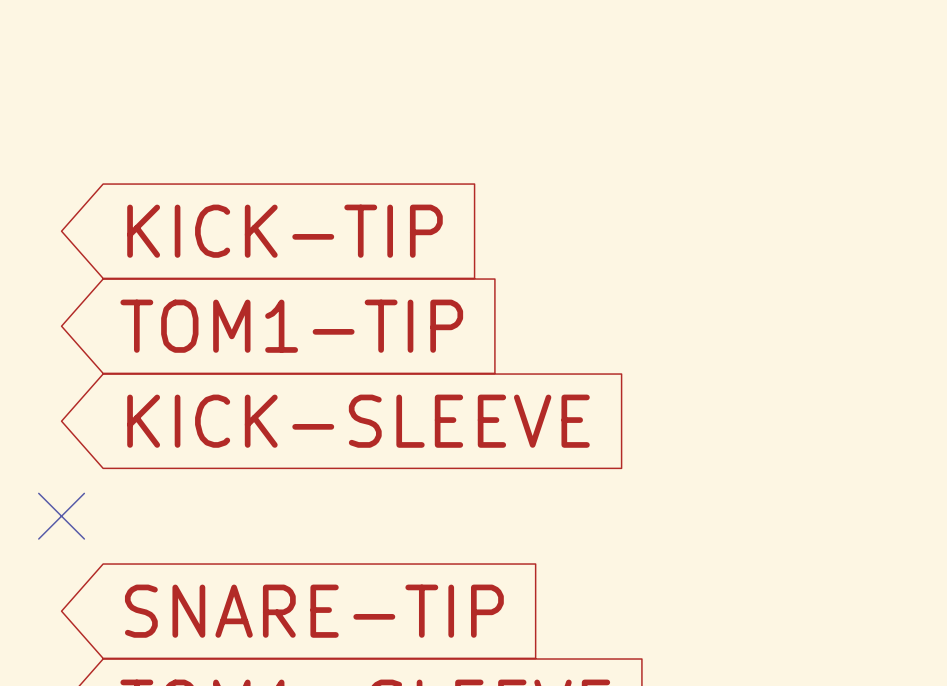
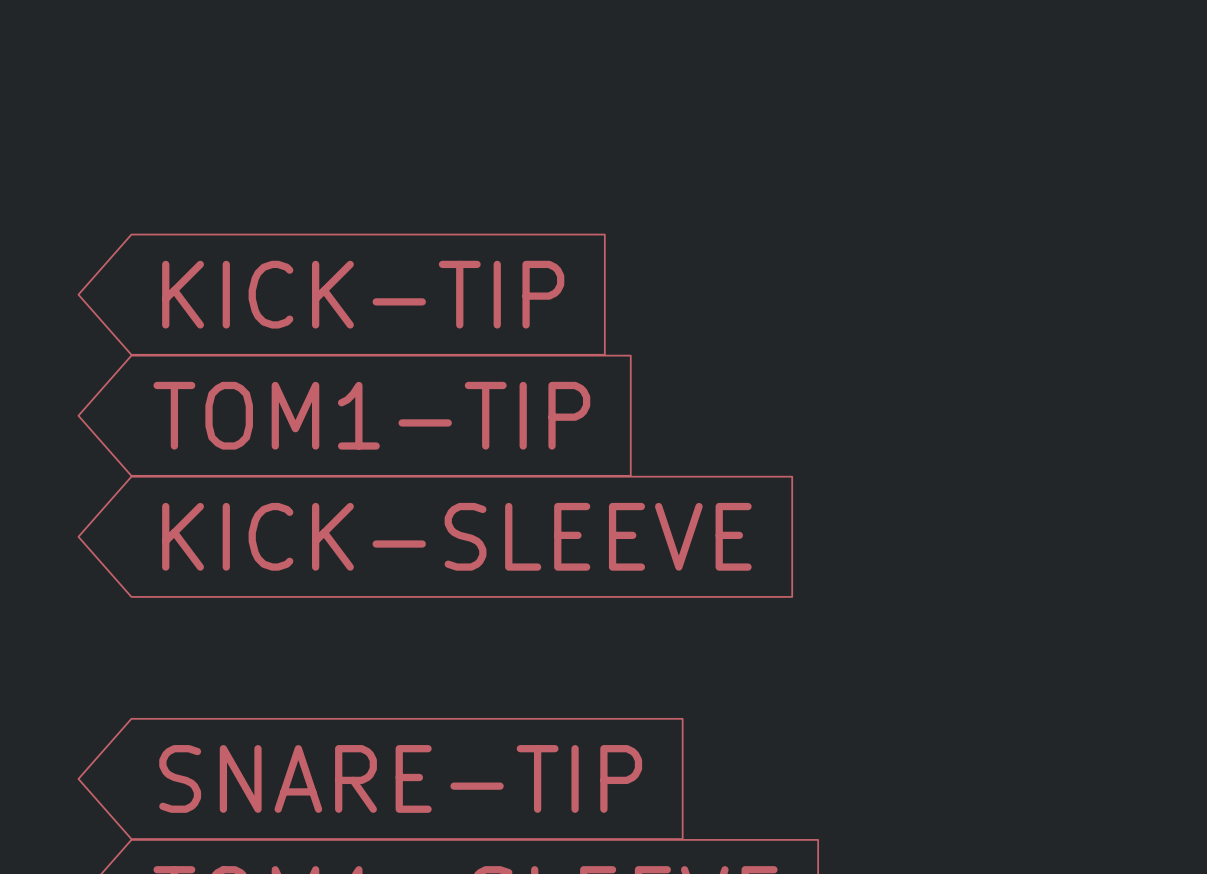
no-connect mark: (61, 516) -> none

